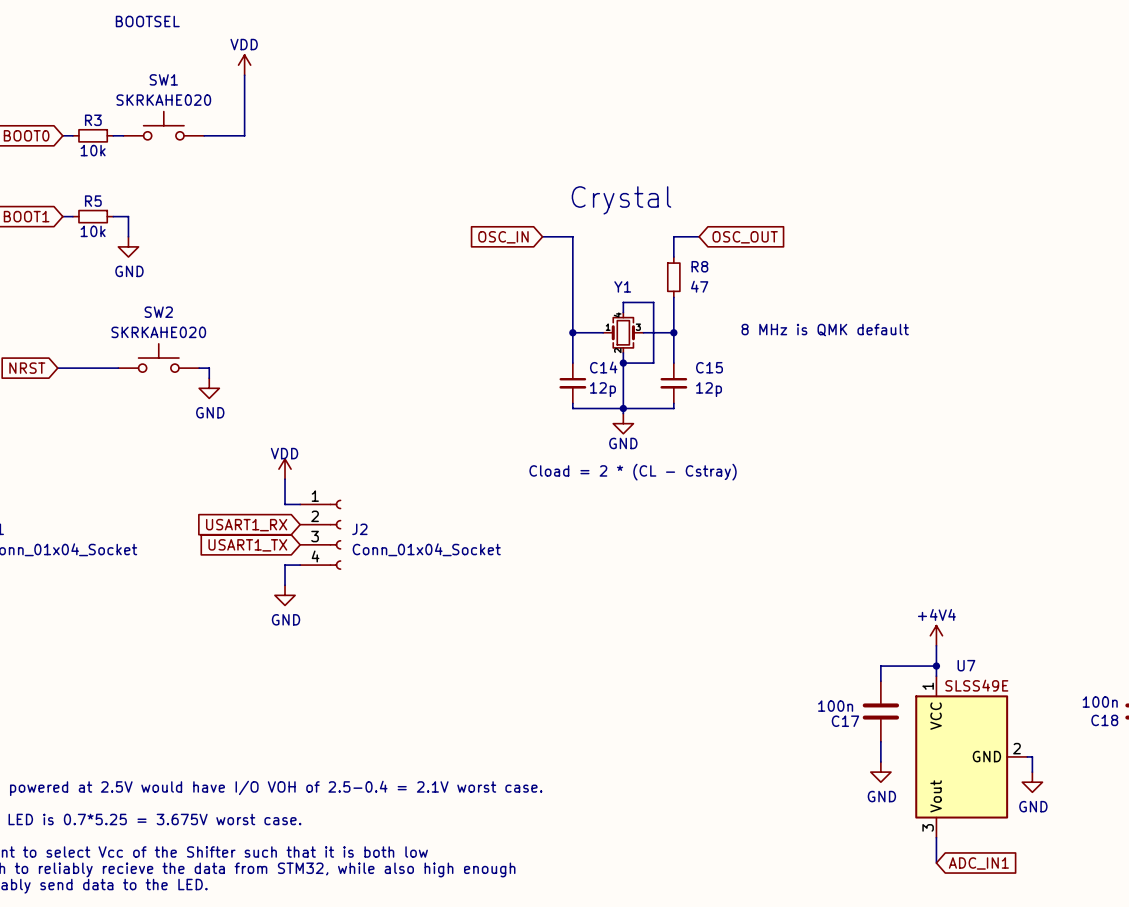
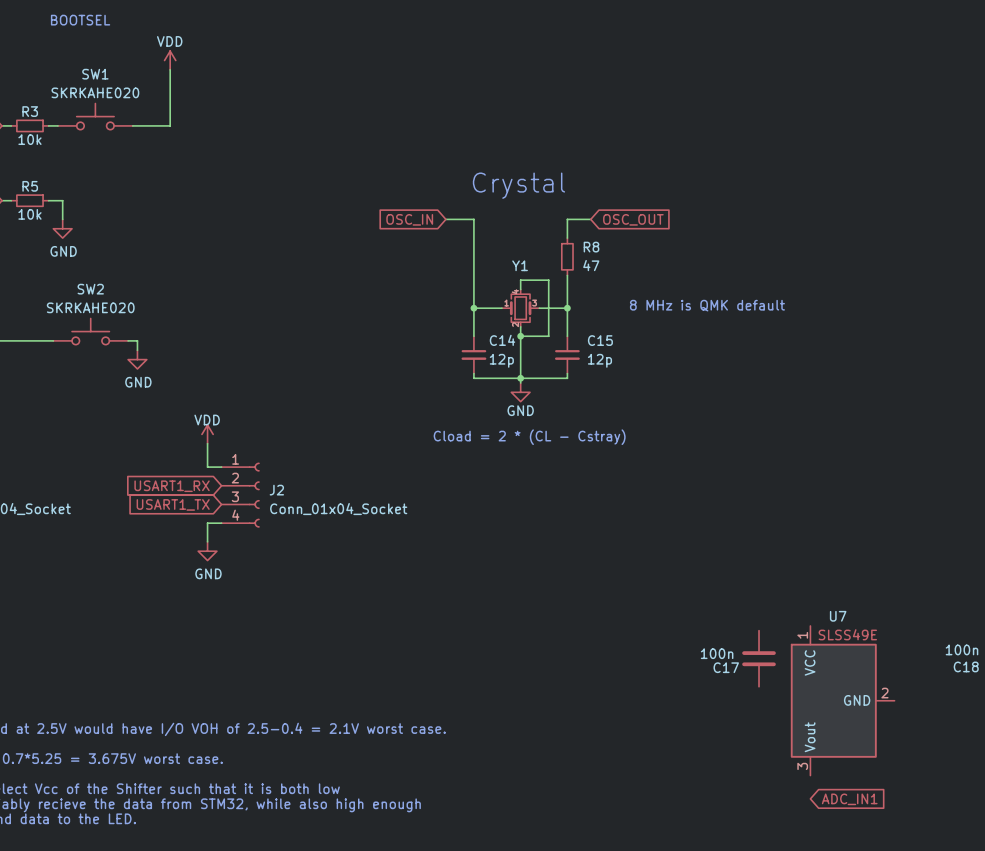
power symbol: +4V4 (936, 635) -> none
wire: (936, 645) (936, 676) -> none
wire: (936, 666) (880, 666) (880, 681) -> none
junction: (936, 666) -> none
wire: (880, 741) (880, 762) -> none
wire: (1027, 756) (1032, 756) (1032, 772) -> none
power symbol: GND (880, 772) -> none
power symbol: GND (1032, 782) -> none
wire: (936, 837) (936, 863) -> none

